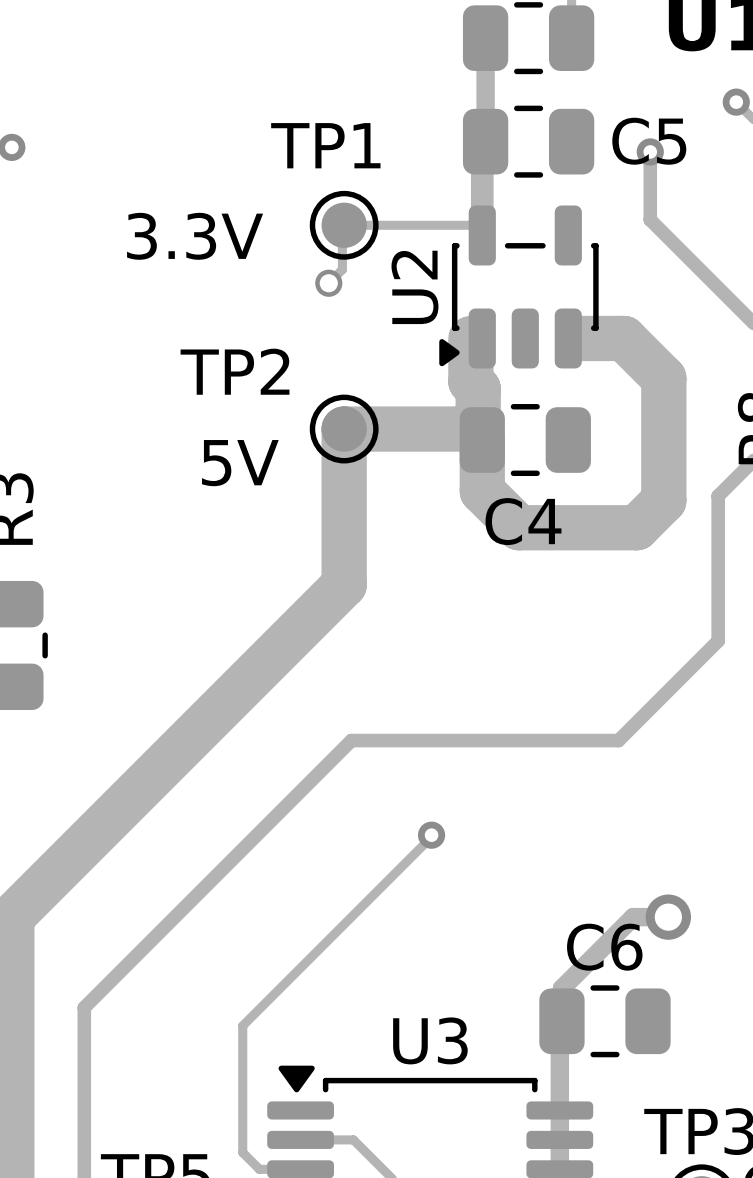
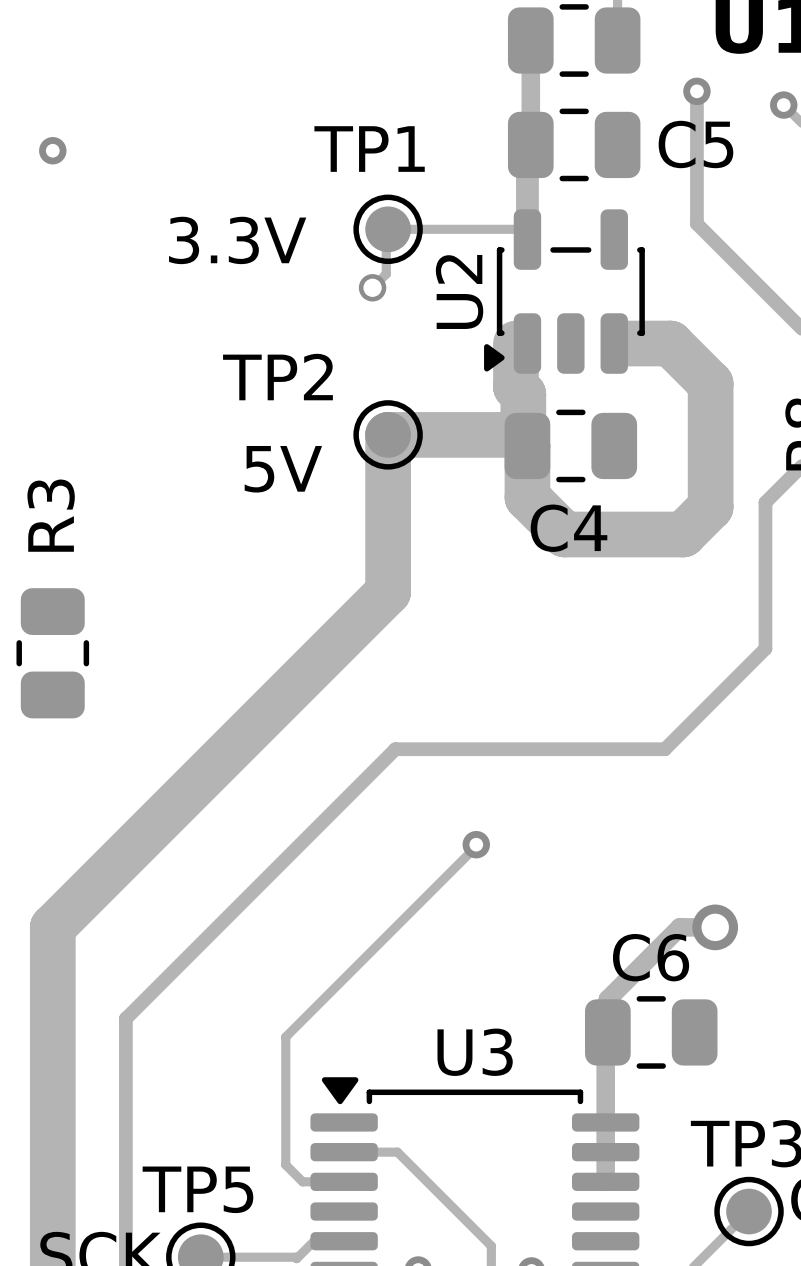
track: none -> (696, 91) (696, 155)
via position: (650, 151) -> (696, 91)

